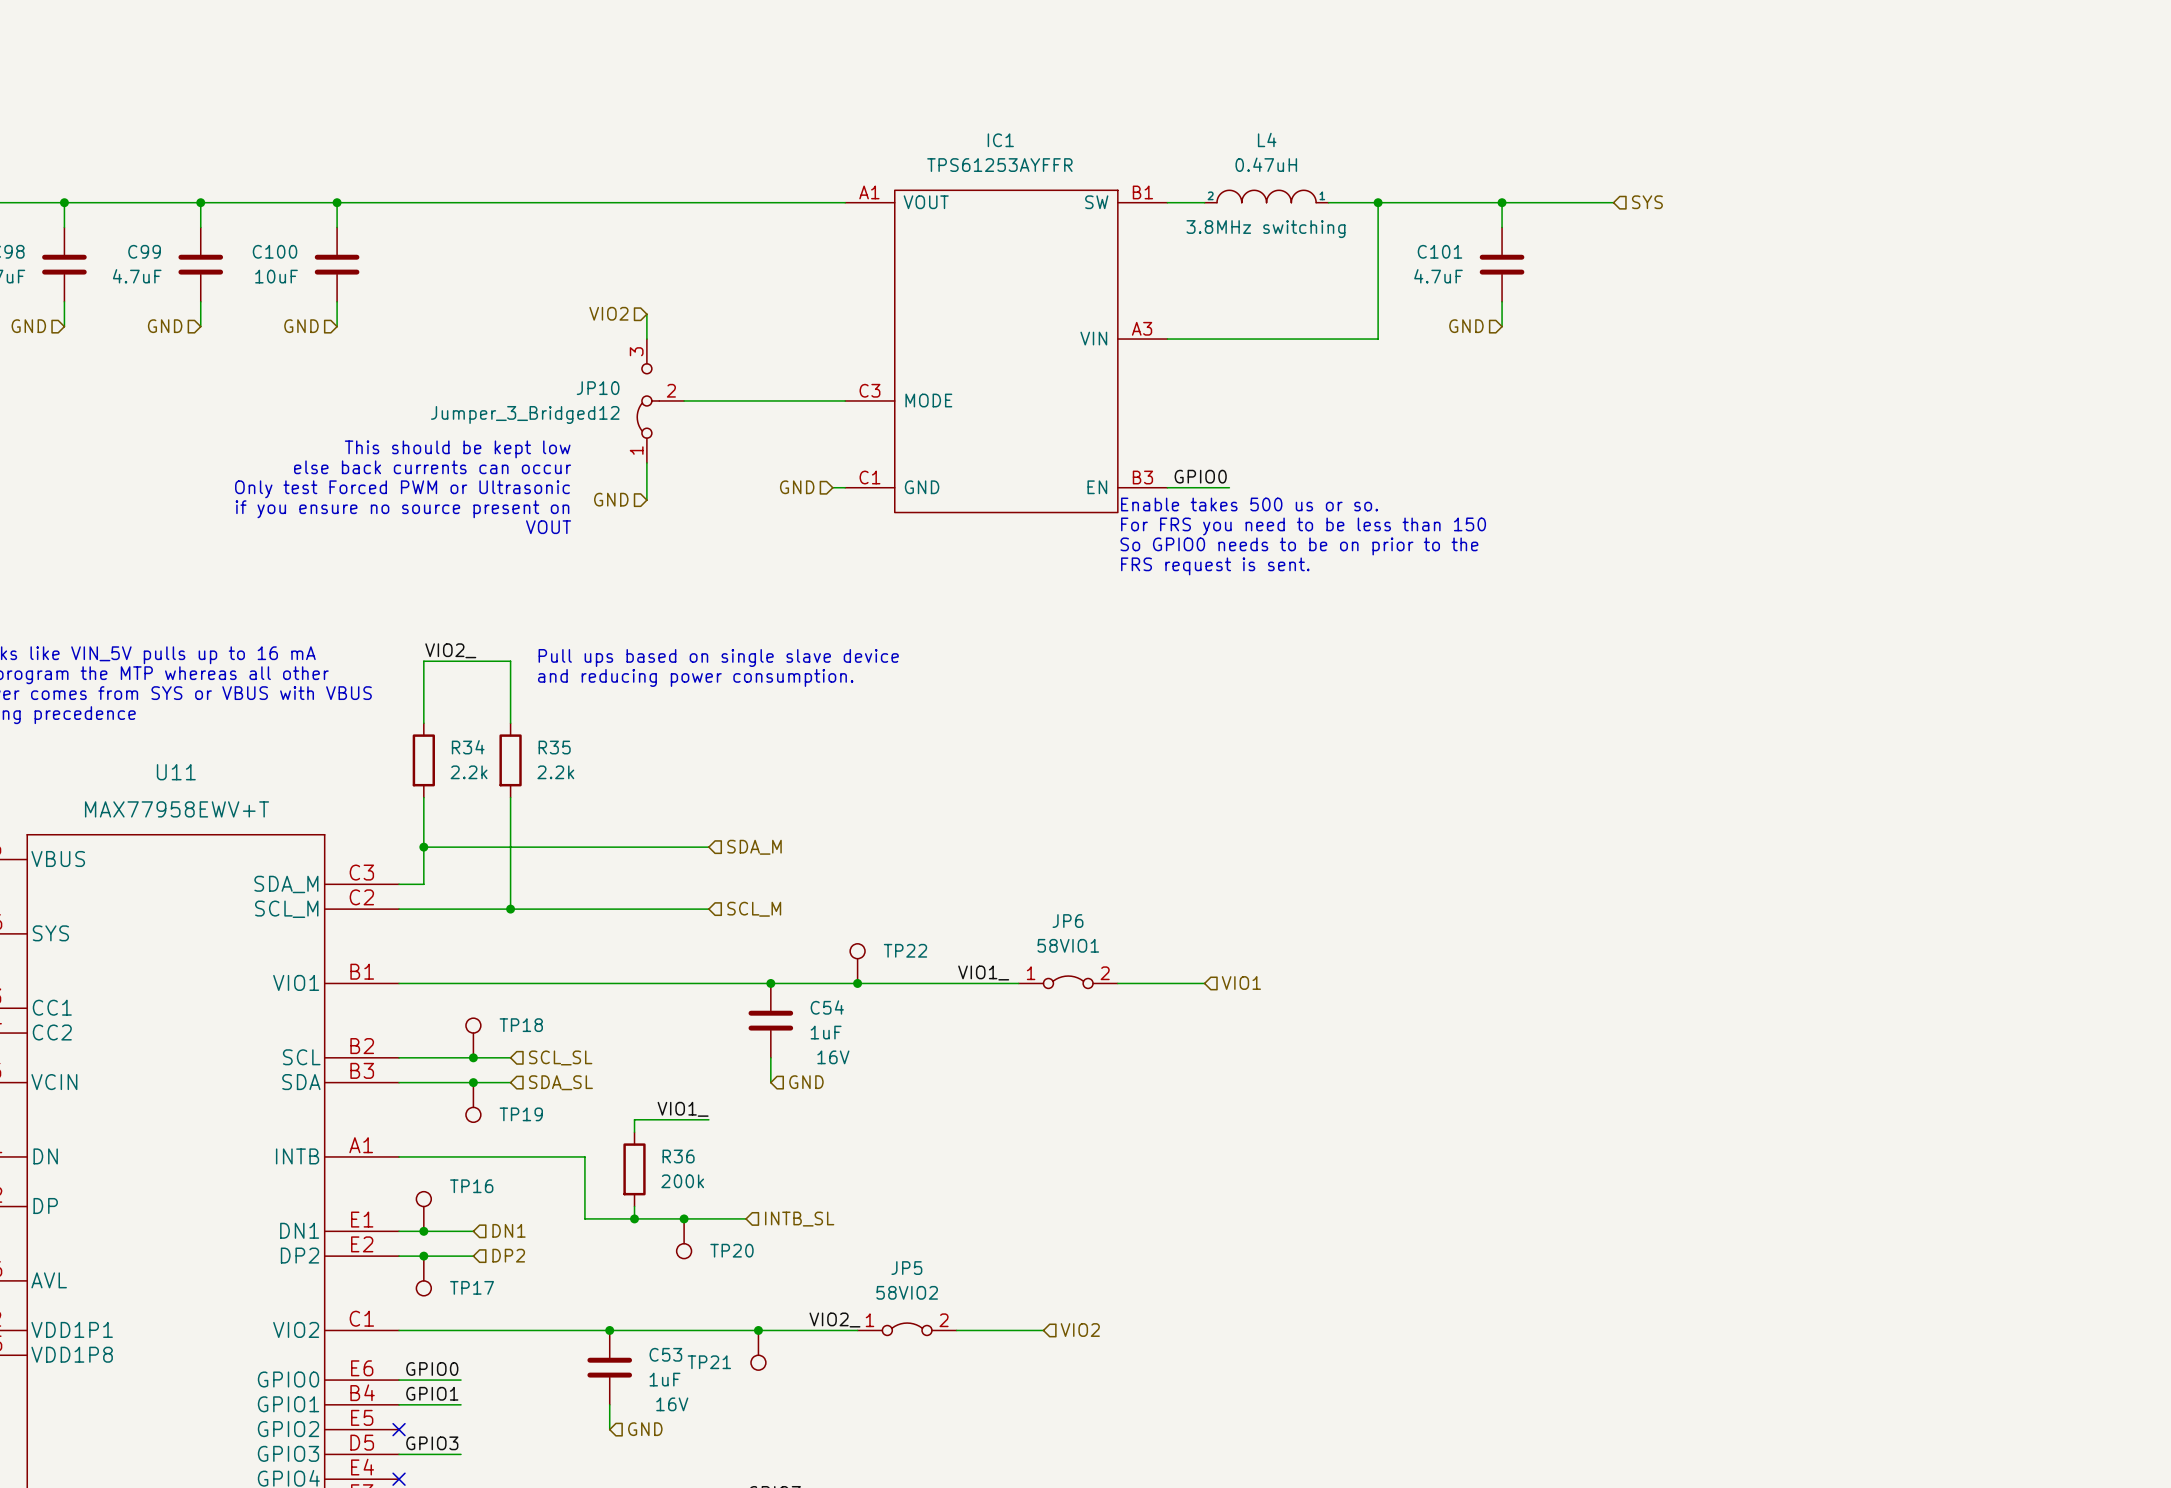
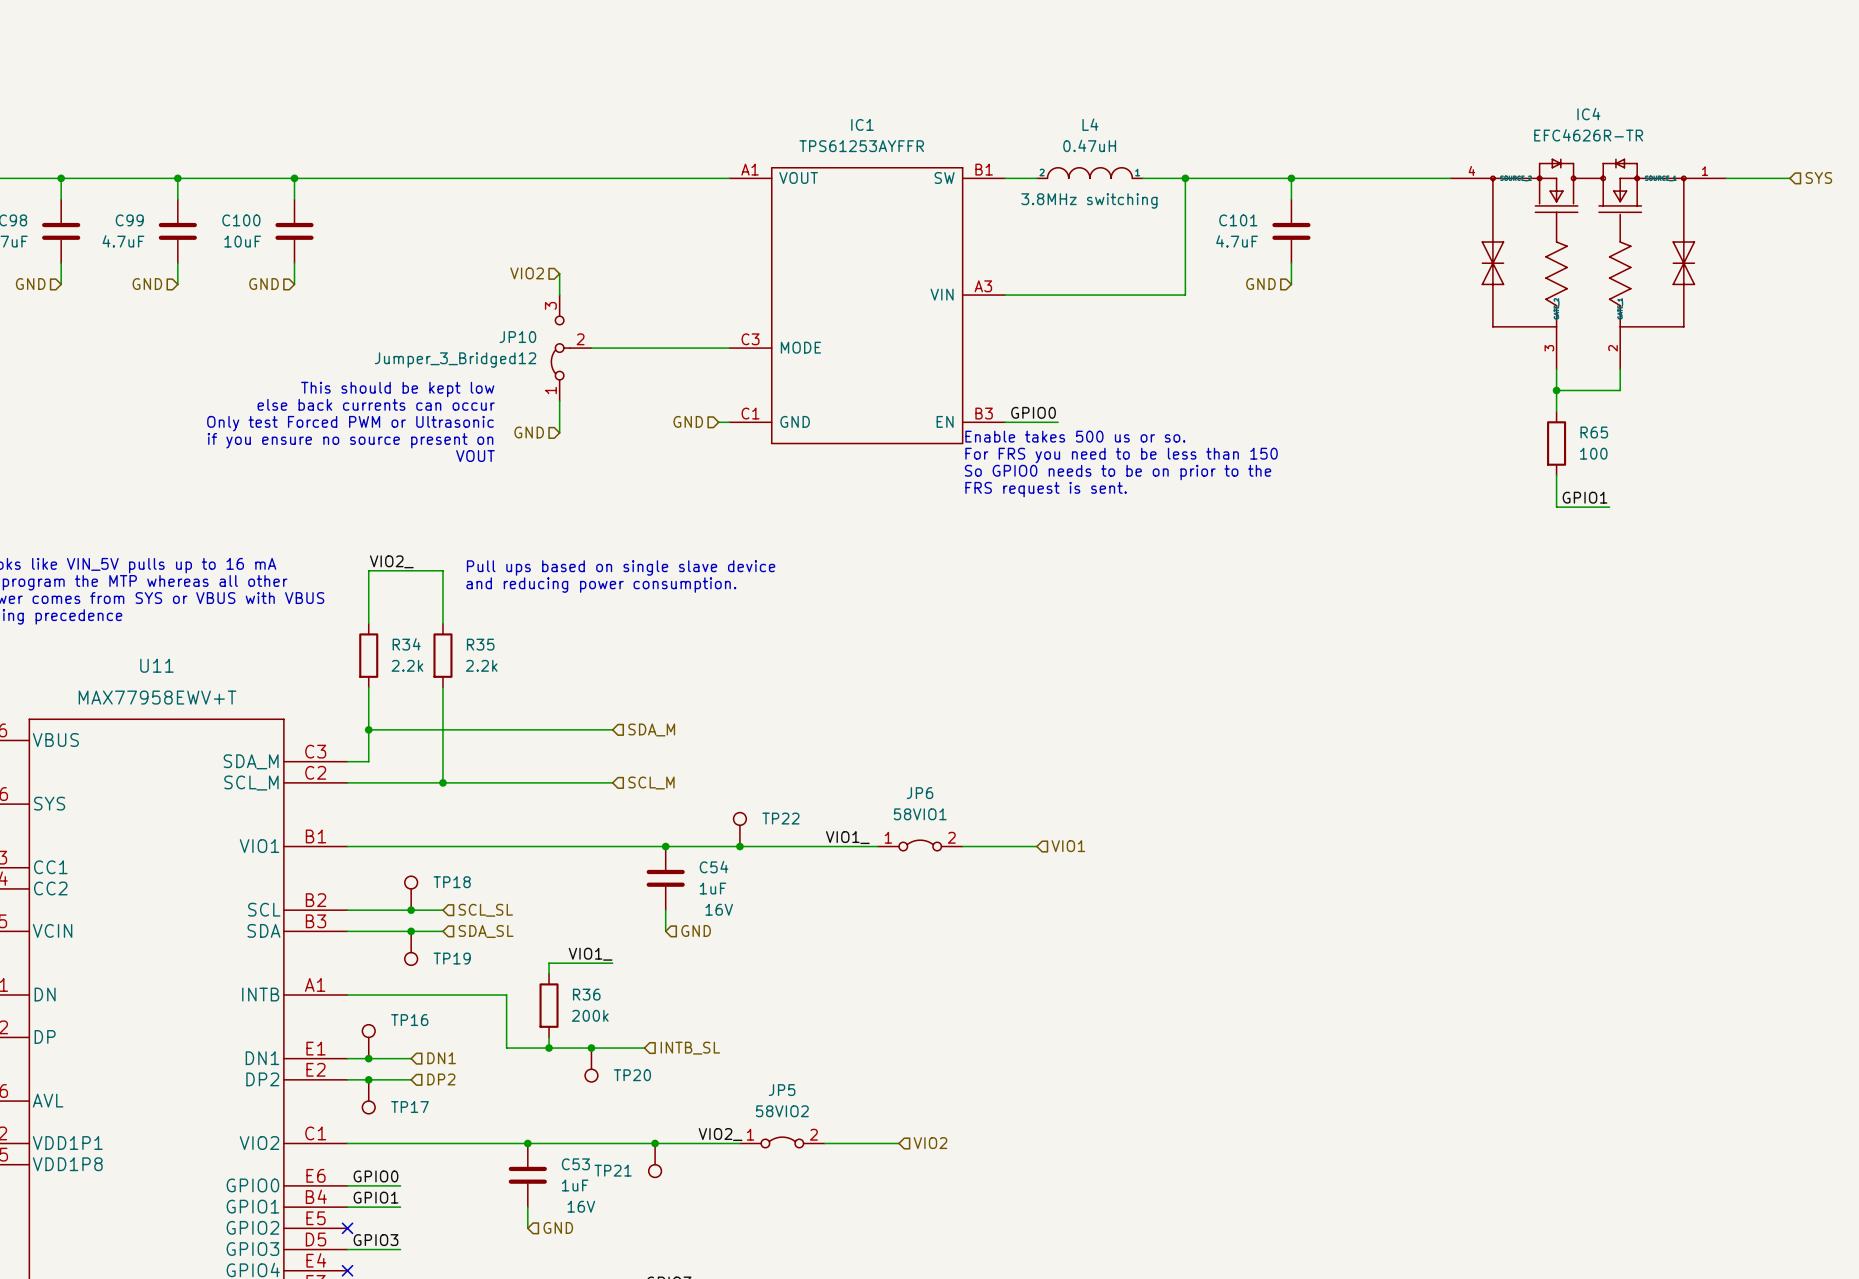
wire: none -> (1386, 178) (1450, 178)
hierarchical label: SYS (1647, 202) -> none
wire: none -> (1726, 178) (1789, 178)
hierarchical label: none -> SYS (1818, 177)
IC4: none -> EFC4626R-TR (1588, 264)
wire: none -> (1556, 369) (1556, 411)
wire: none -> (1620, 369) (1620, 390) (1556, 390)
junction: none -> (1556, 390)
R65: none -> 100 (1556, 443)
wire: none -> (1556, 475) (1556, 507) (1609, 507)
label: none -> GPIO1 (1585, 497)

